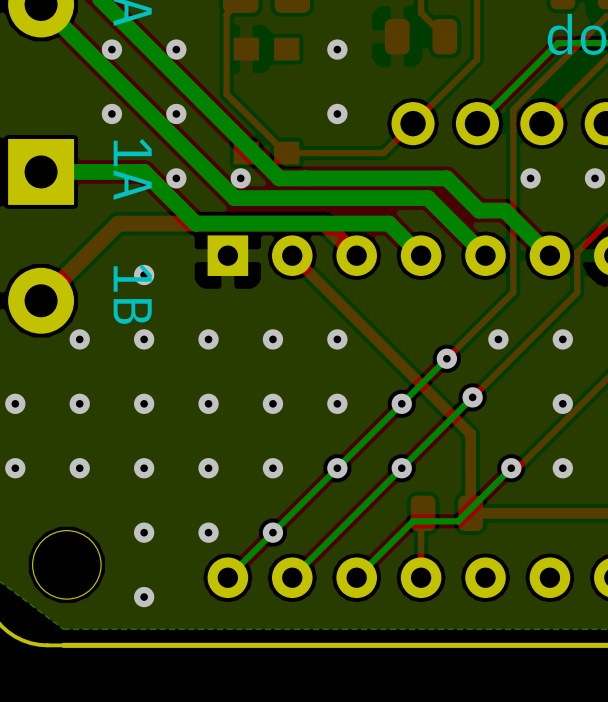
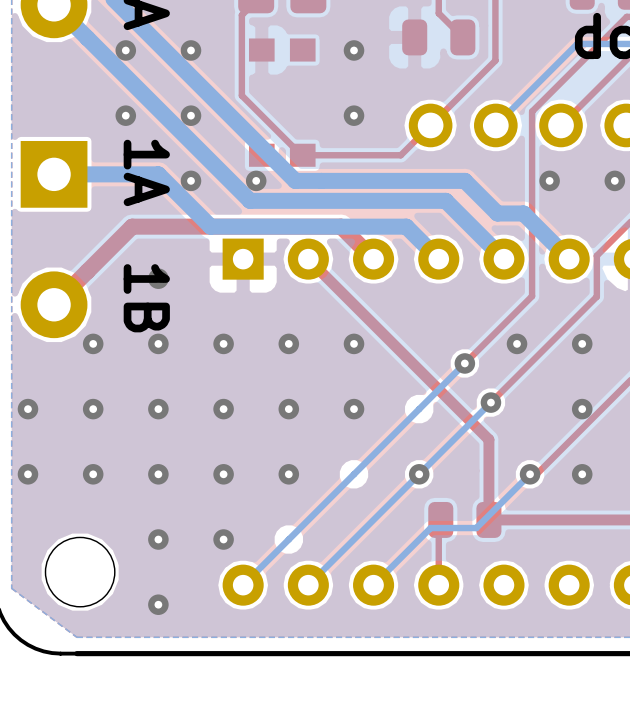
via: (401, 403) -> none
via: (337, 468) -> none
via: (272, 532) -> none

